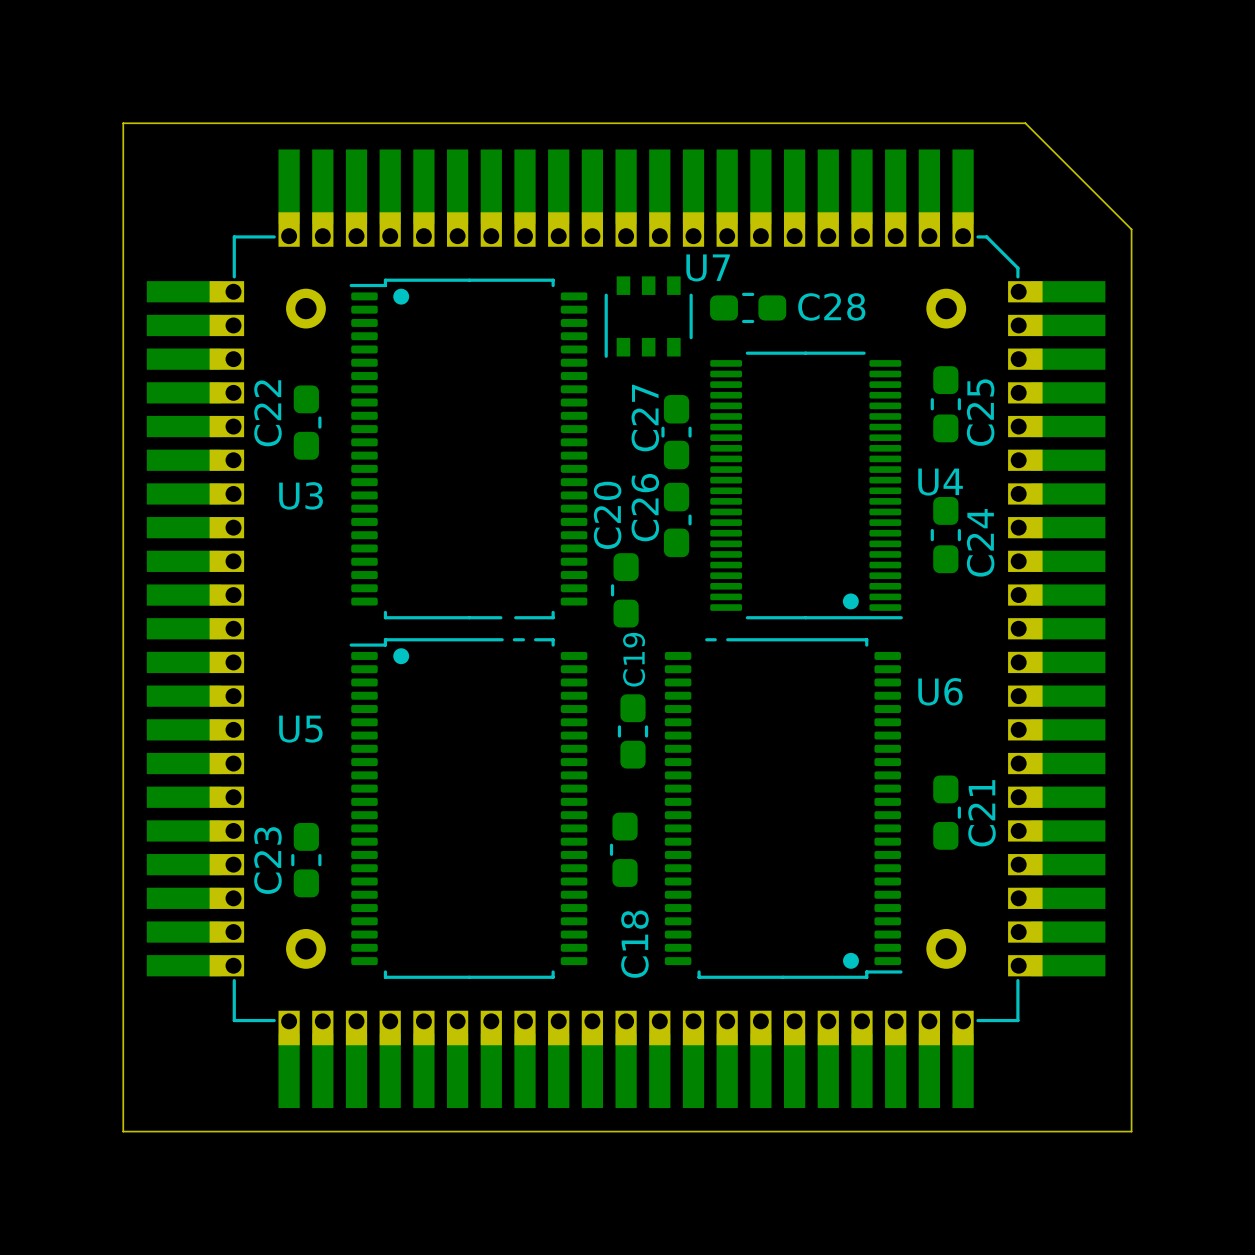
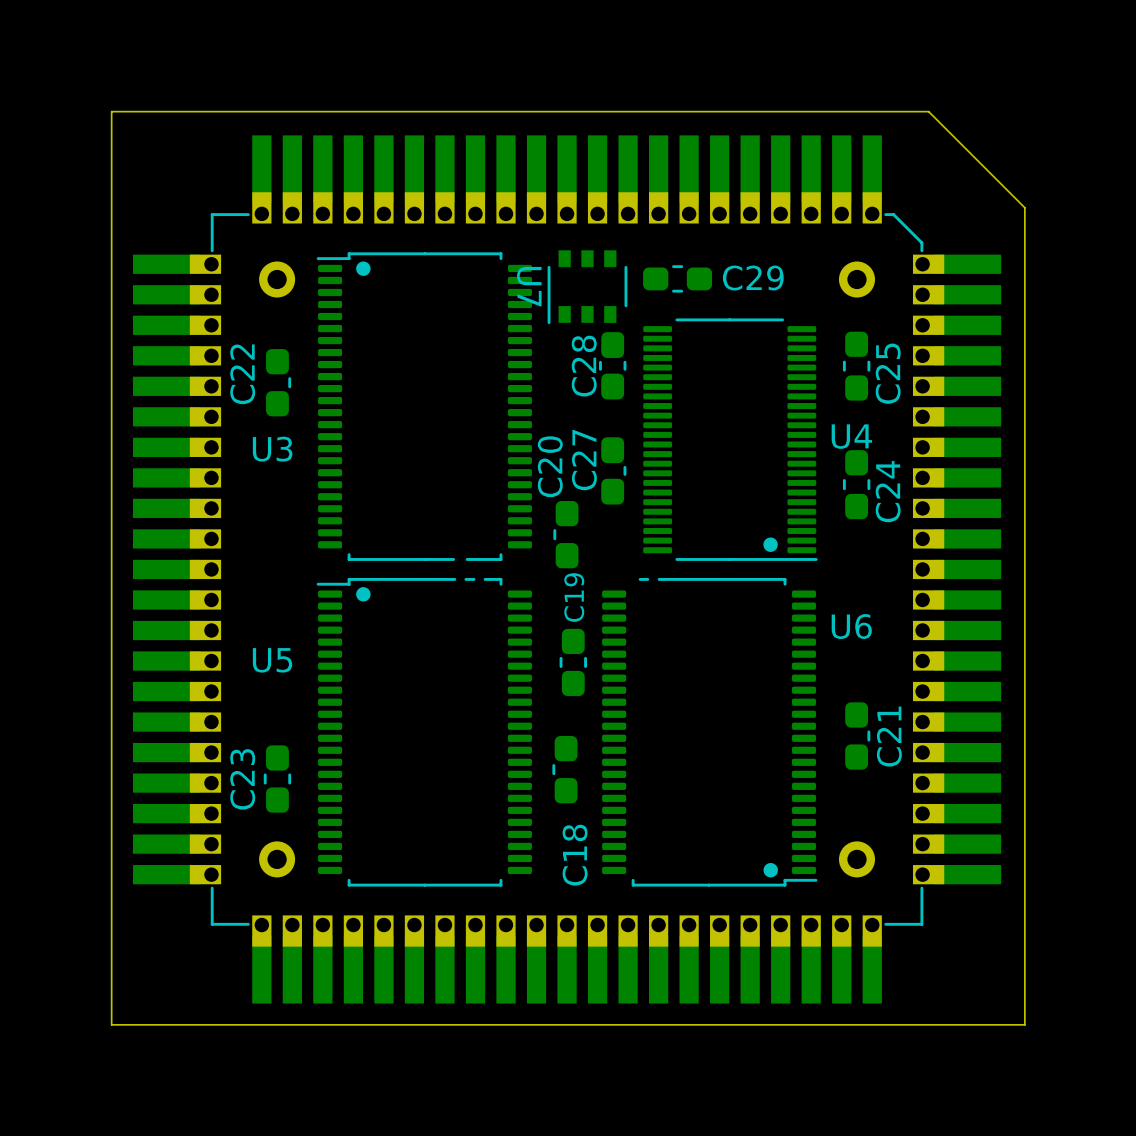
U7 name rotation: 0° (708, 267) -> 90° clockwise (529, 286)
U7 name position: U7 (708, 267) -> U7 (529, 286)
C28 name: C28 (831, 306) -> C29 (753, 278)
C28: none -> (612, 365)
C27: (676, 432) -> none
C26 name: C26 (645, 507) -> C27 (584, 460)

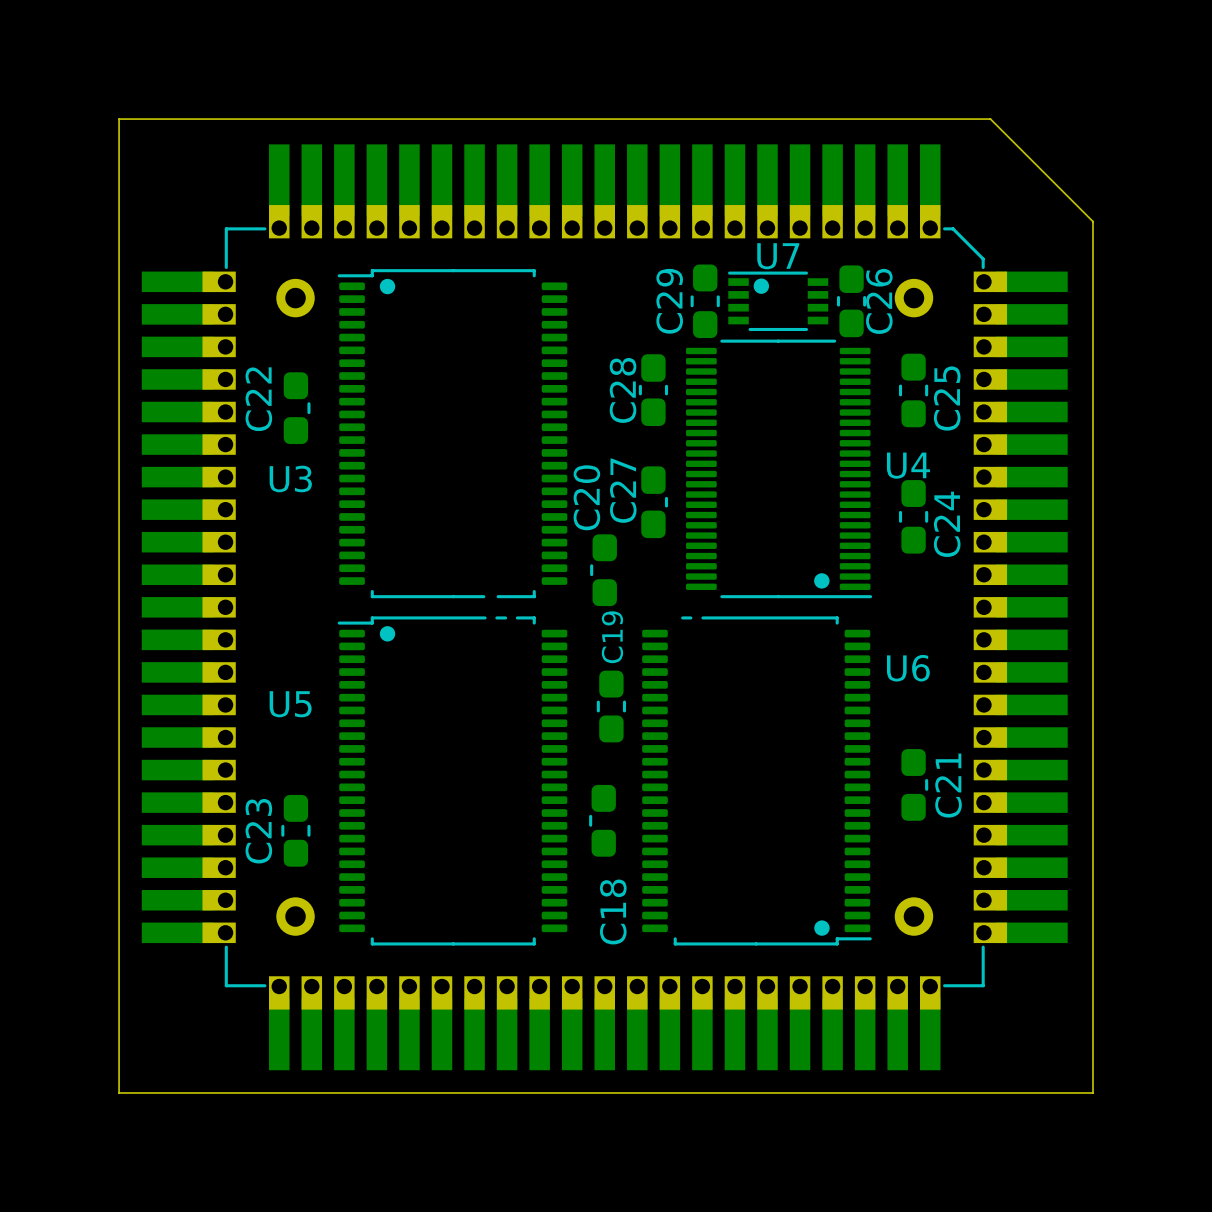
U7 footprint: [547, 250, 628, 325] -> [728, 271, 829, 332]
C29 rotation: 0° (677, 278) -> 90° clockwise (705, 301)
C29 name position: C29 (753, 278) -> C29 (669, 301)
C26: none -> (851, 301)
U7 name position: U7 (529, 286) -> U7 (778, 256)

